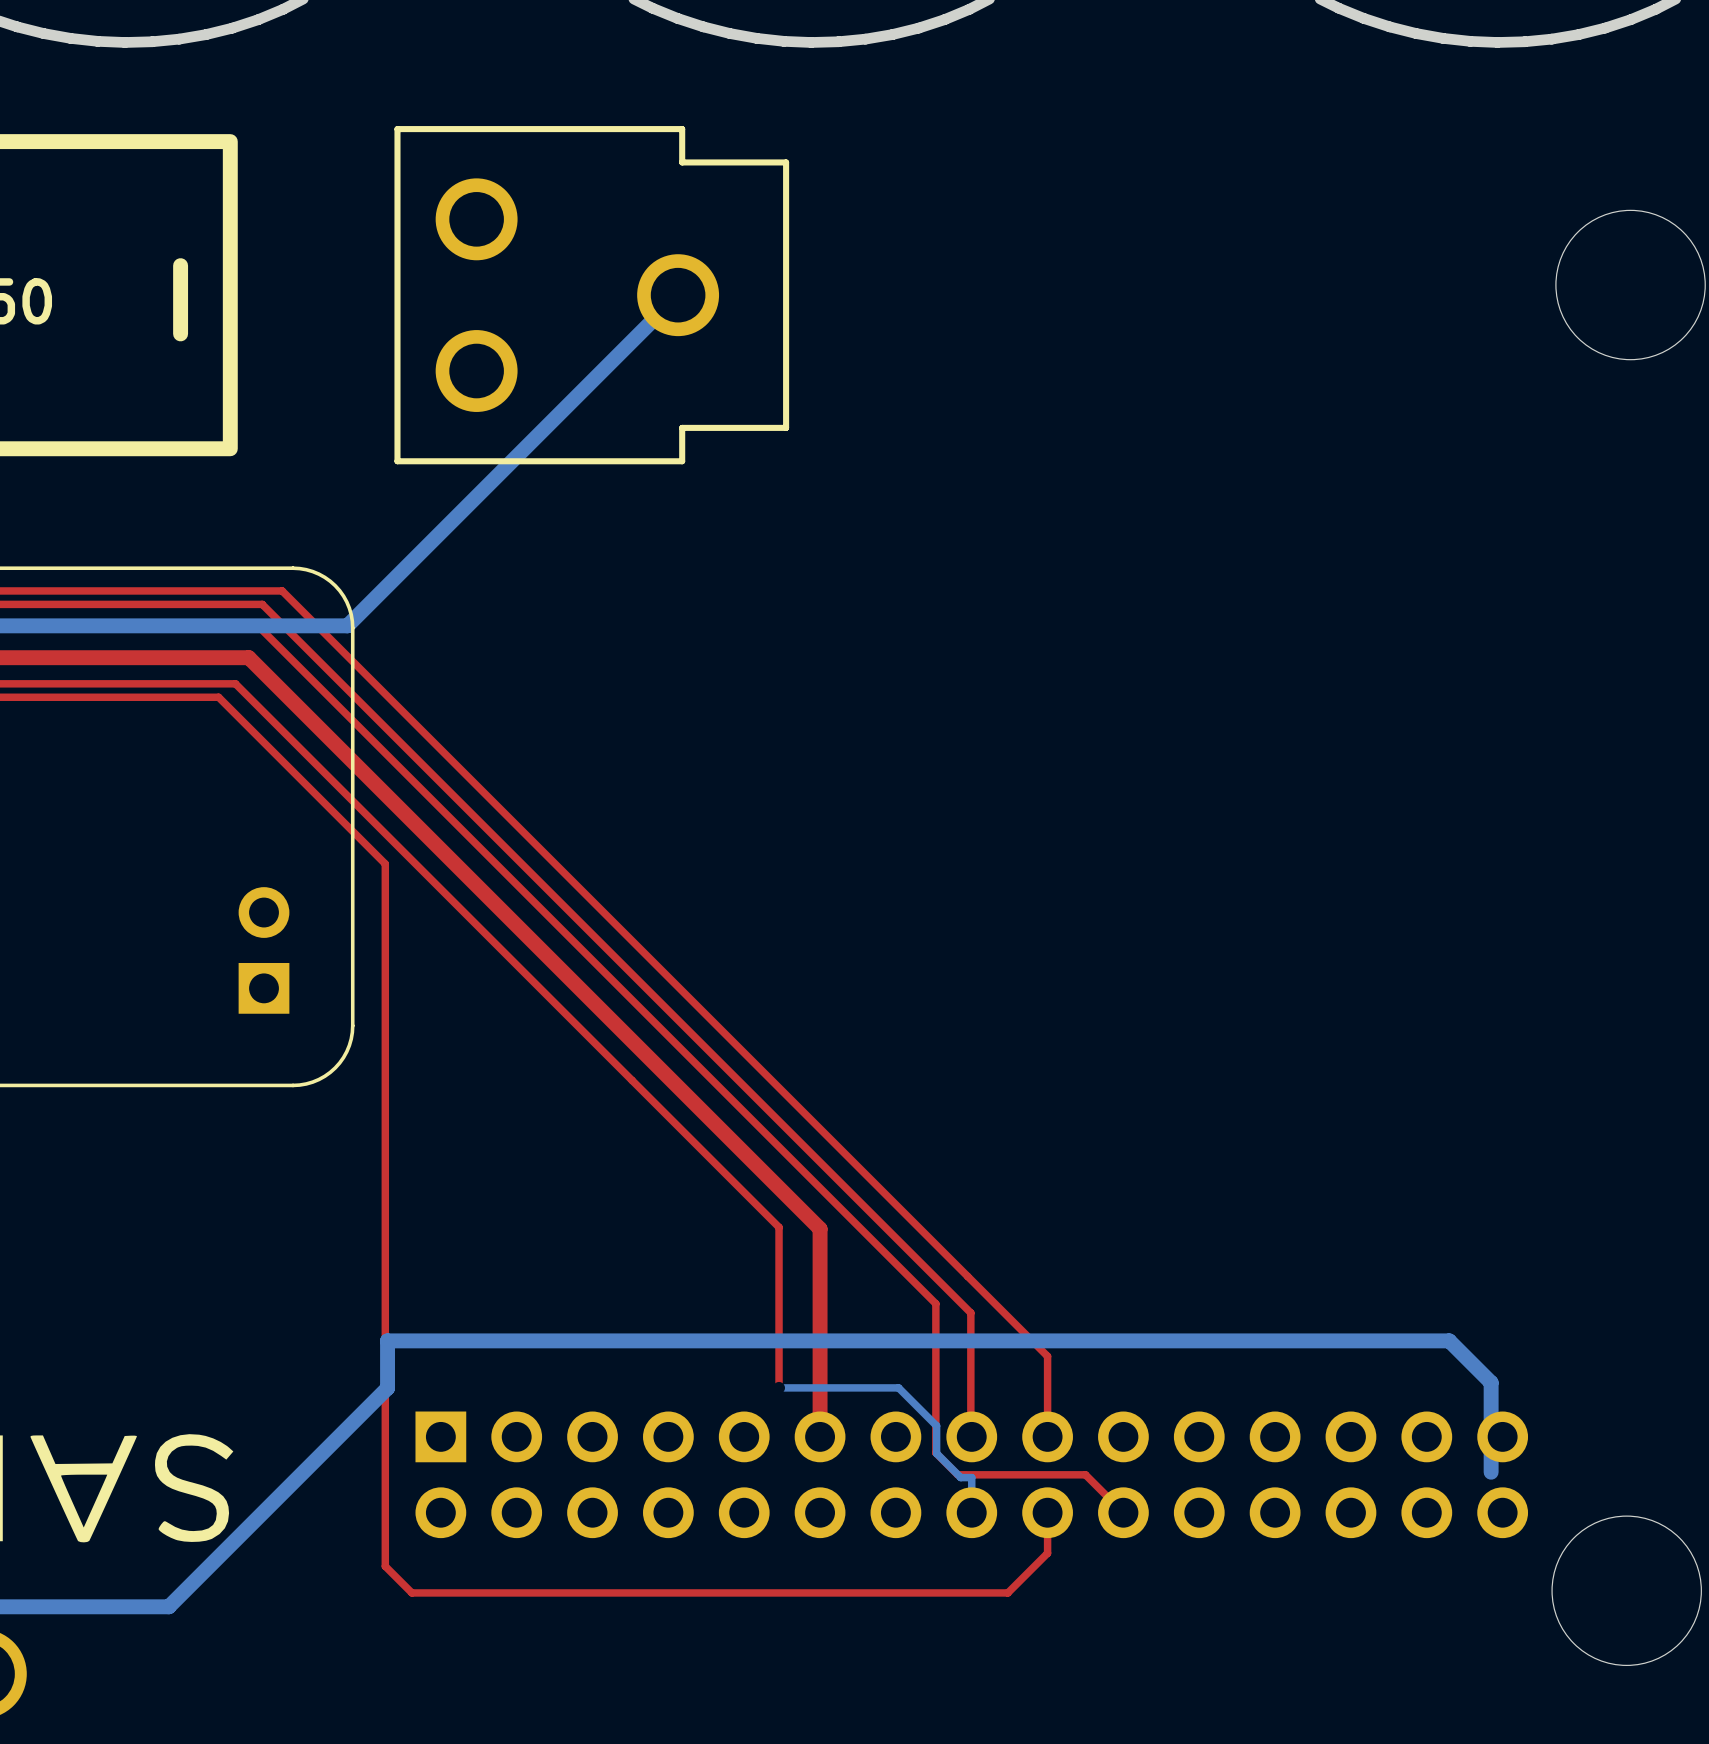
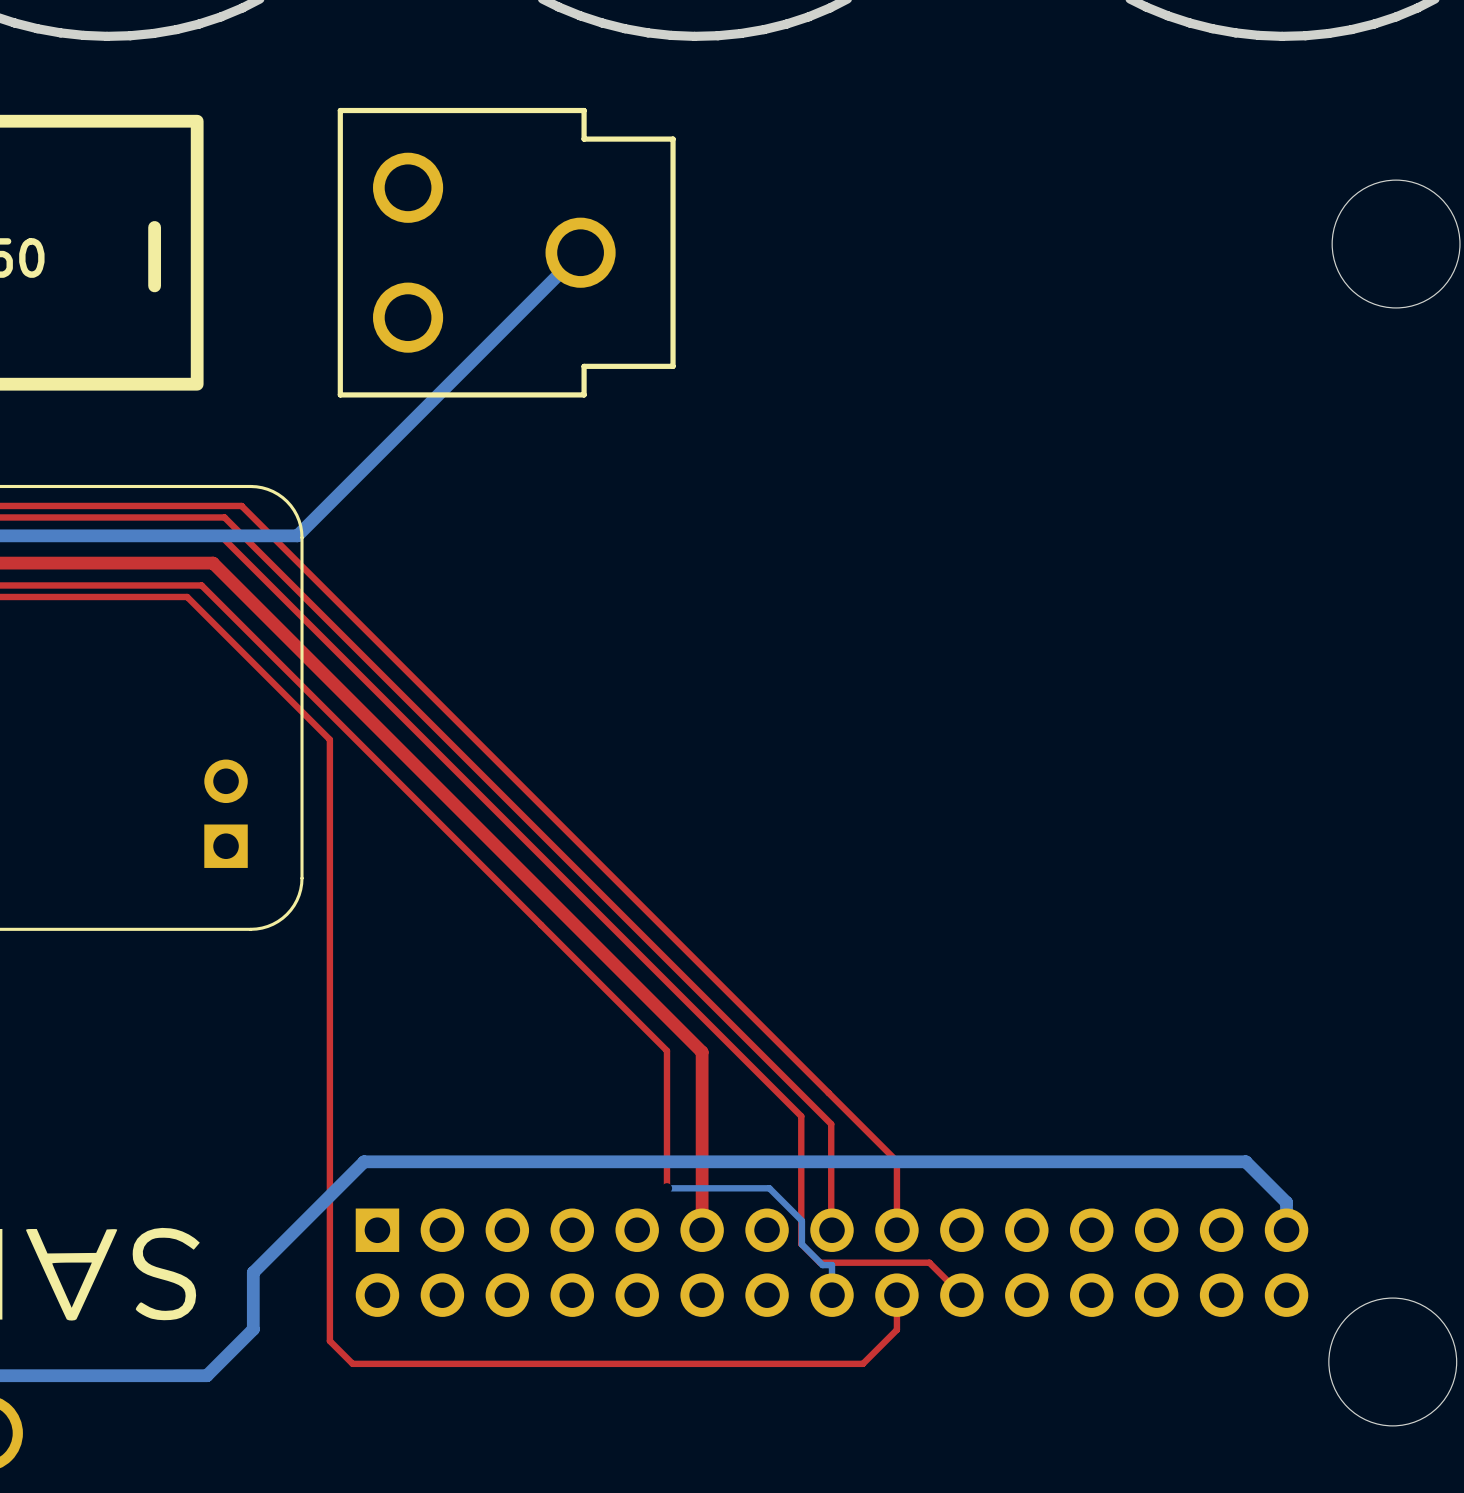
bottom track: (1491, 1472) (1491, 1382) (1449, 1340) (387, 1340) (387, 1388) (168, 1606) -> (1280, 1224) (1286, 1222) (1286, 1202) (1245, 1161) (364, 1161) (253, 1272) (253, 1329) (206, 1375) (144, 1375)

